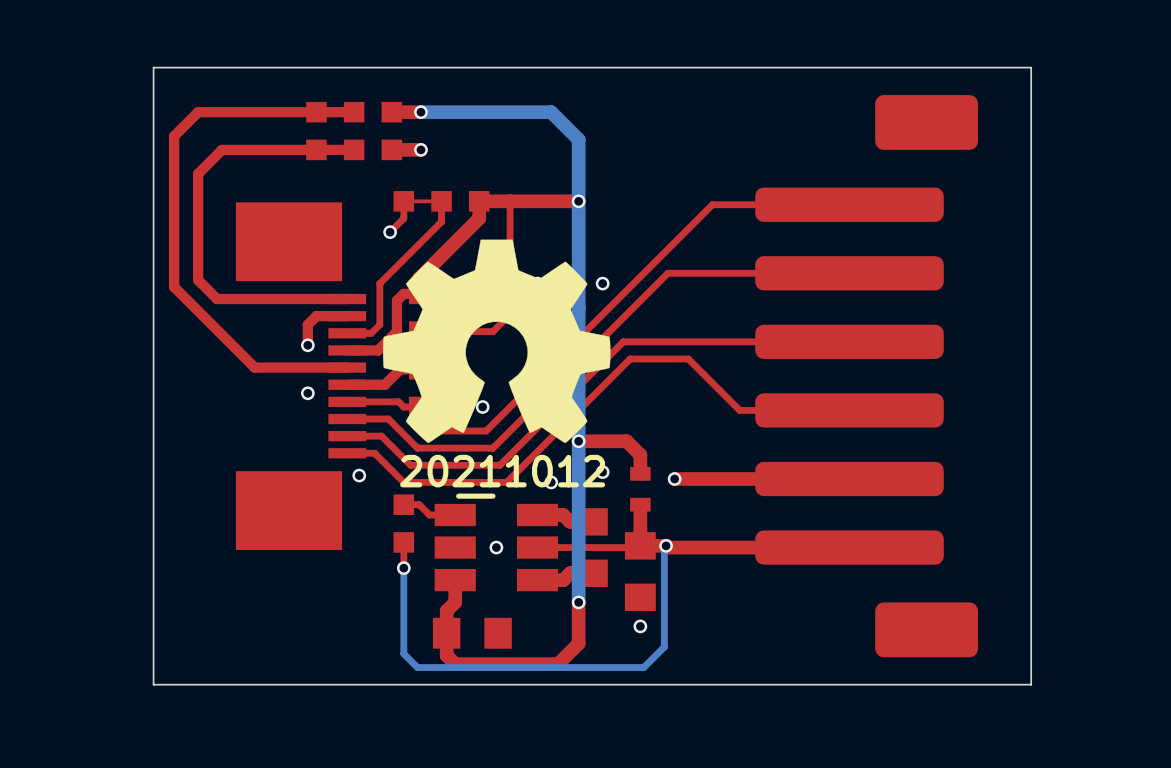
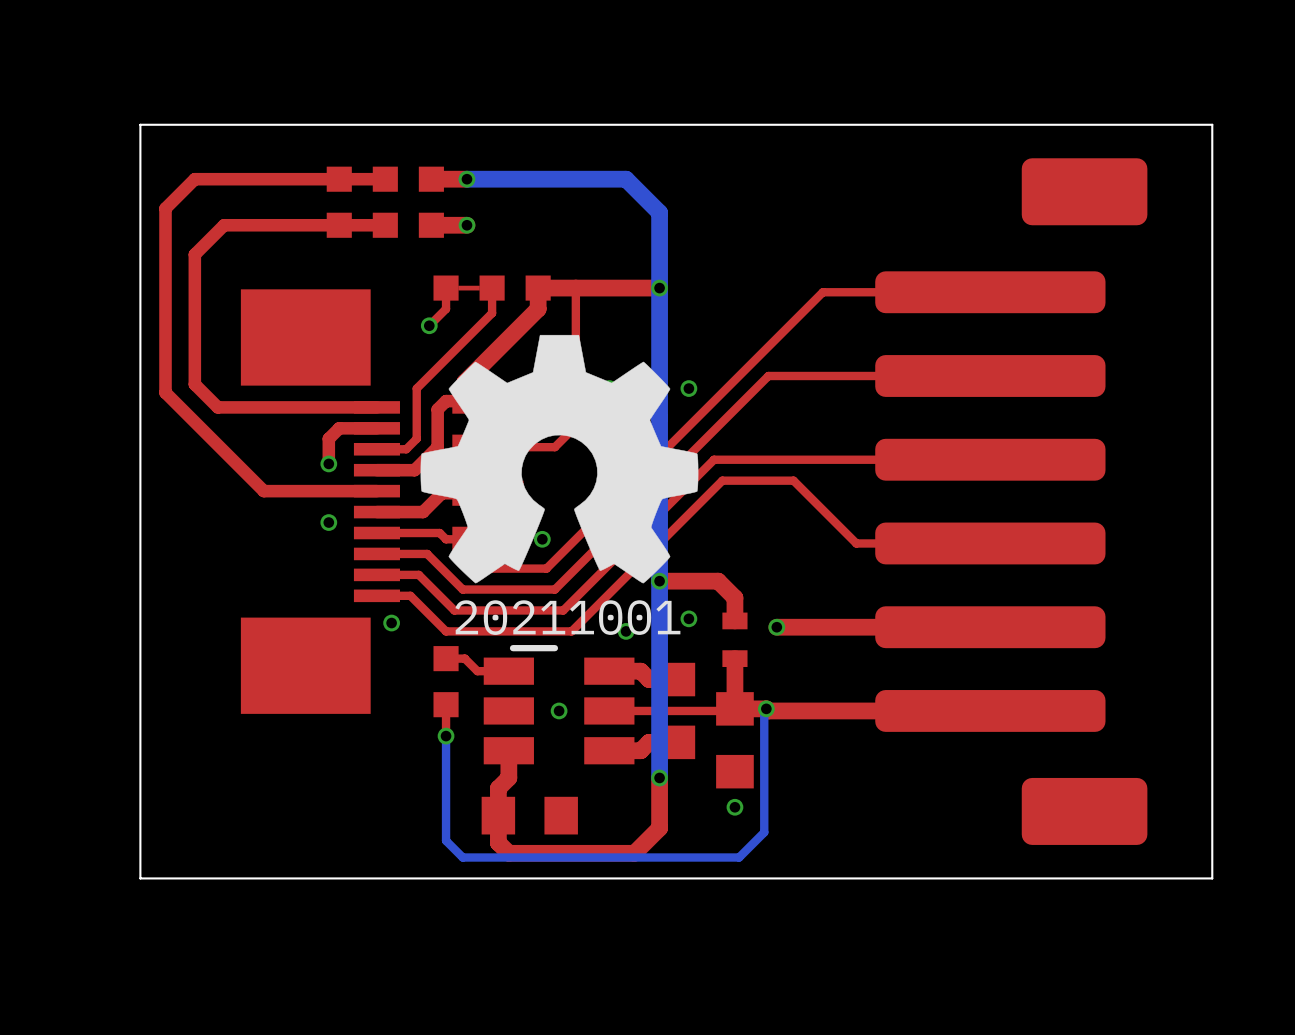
drawing shape: [400, 454, 606, 499] -> [455, 600, 681, 652]

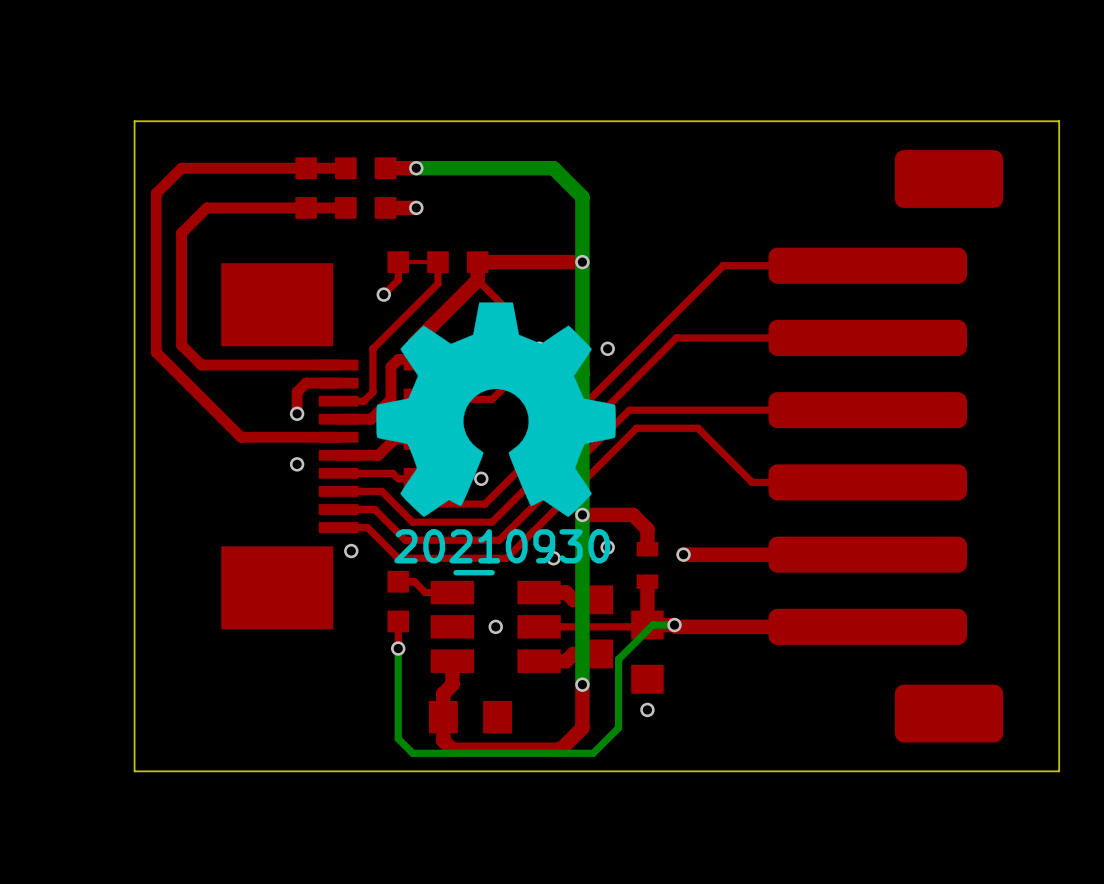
top track: (575, 288) (575, 346) -> (477, 280) (510, 312)
drawing shape: [455, 600, 681, 652] -> [394, 529, 611, 576]
bottom track: (764, 708) (764, 832) (739, 857) (672, 857) -> (672, 625) (652, 625) (618, 659) (618, 728) (593, 753)

